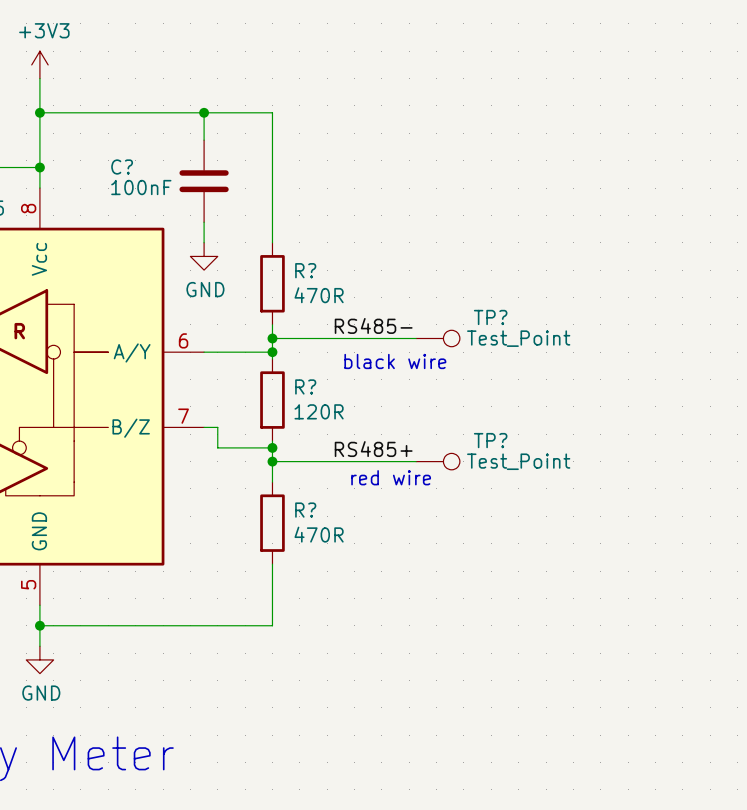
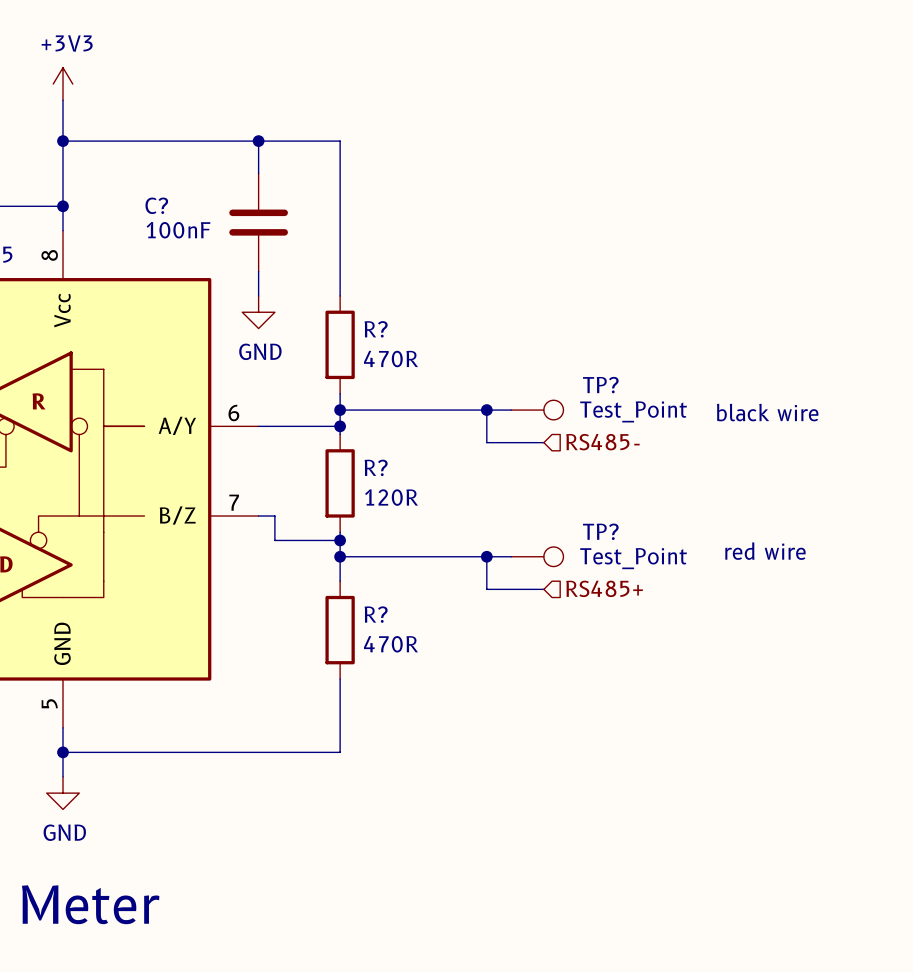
label: RS485- (373, 325) -> none
wire: none -> (486, 410) (486, 442) (543, 442)
junction: none -> (486, 410)
text position: black wire (395, 361) -> black wire (767, 412)
hierarchical label: none -> RS485- (602, 442)
label: RS485+ (373, 449) -> none
wire: none -> (486, 556) (486, 589) (543, 589)
junction: none -> (486, 556)
text position: red wire (391, 477) -> red wire (765, 551)
hierarchical label: none -> RS485+ (604, 588)

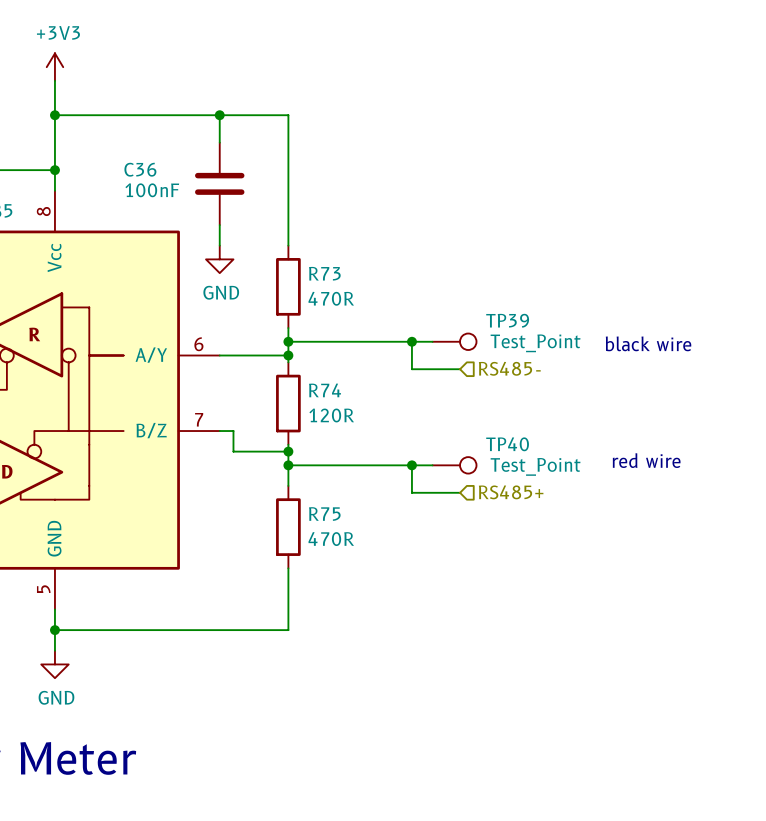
C? name: C? (156, 205) -> C36 (140, 169)
R? name: R? (376, 329) -> R73 (324, 273)
TP? name: TP? (600, 385) -> TP39 (507, 320)
R? name: R? (376, 467) -> R74 (325, 390)
TP? name: TP? (600, 531) -> TP40 (507, 444)
R? name: R? (376, 614) -> R75 (324, 514)

